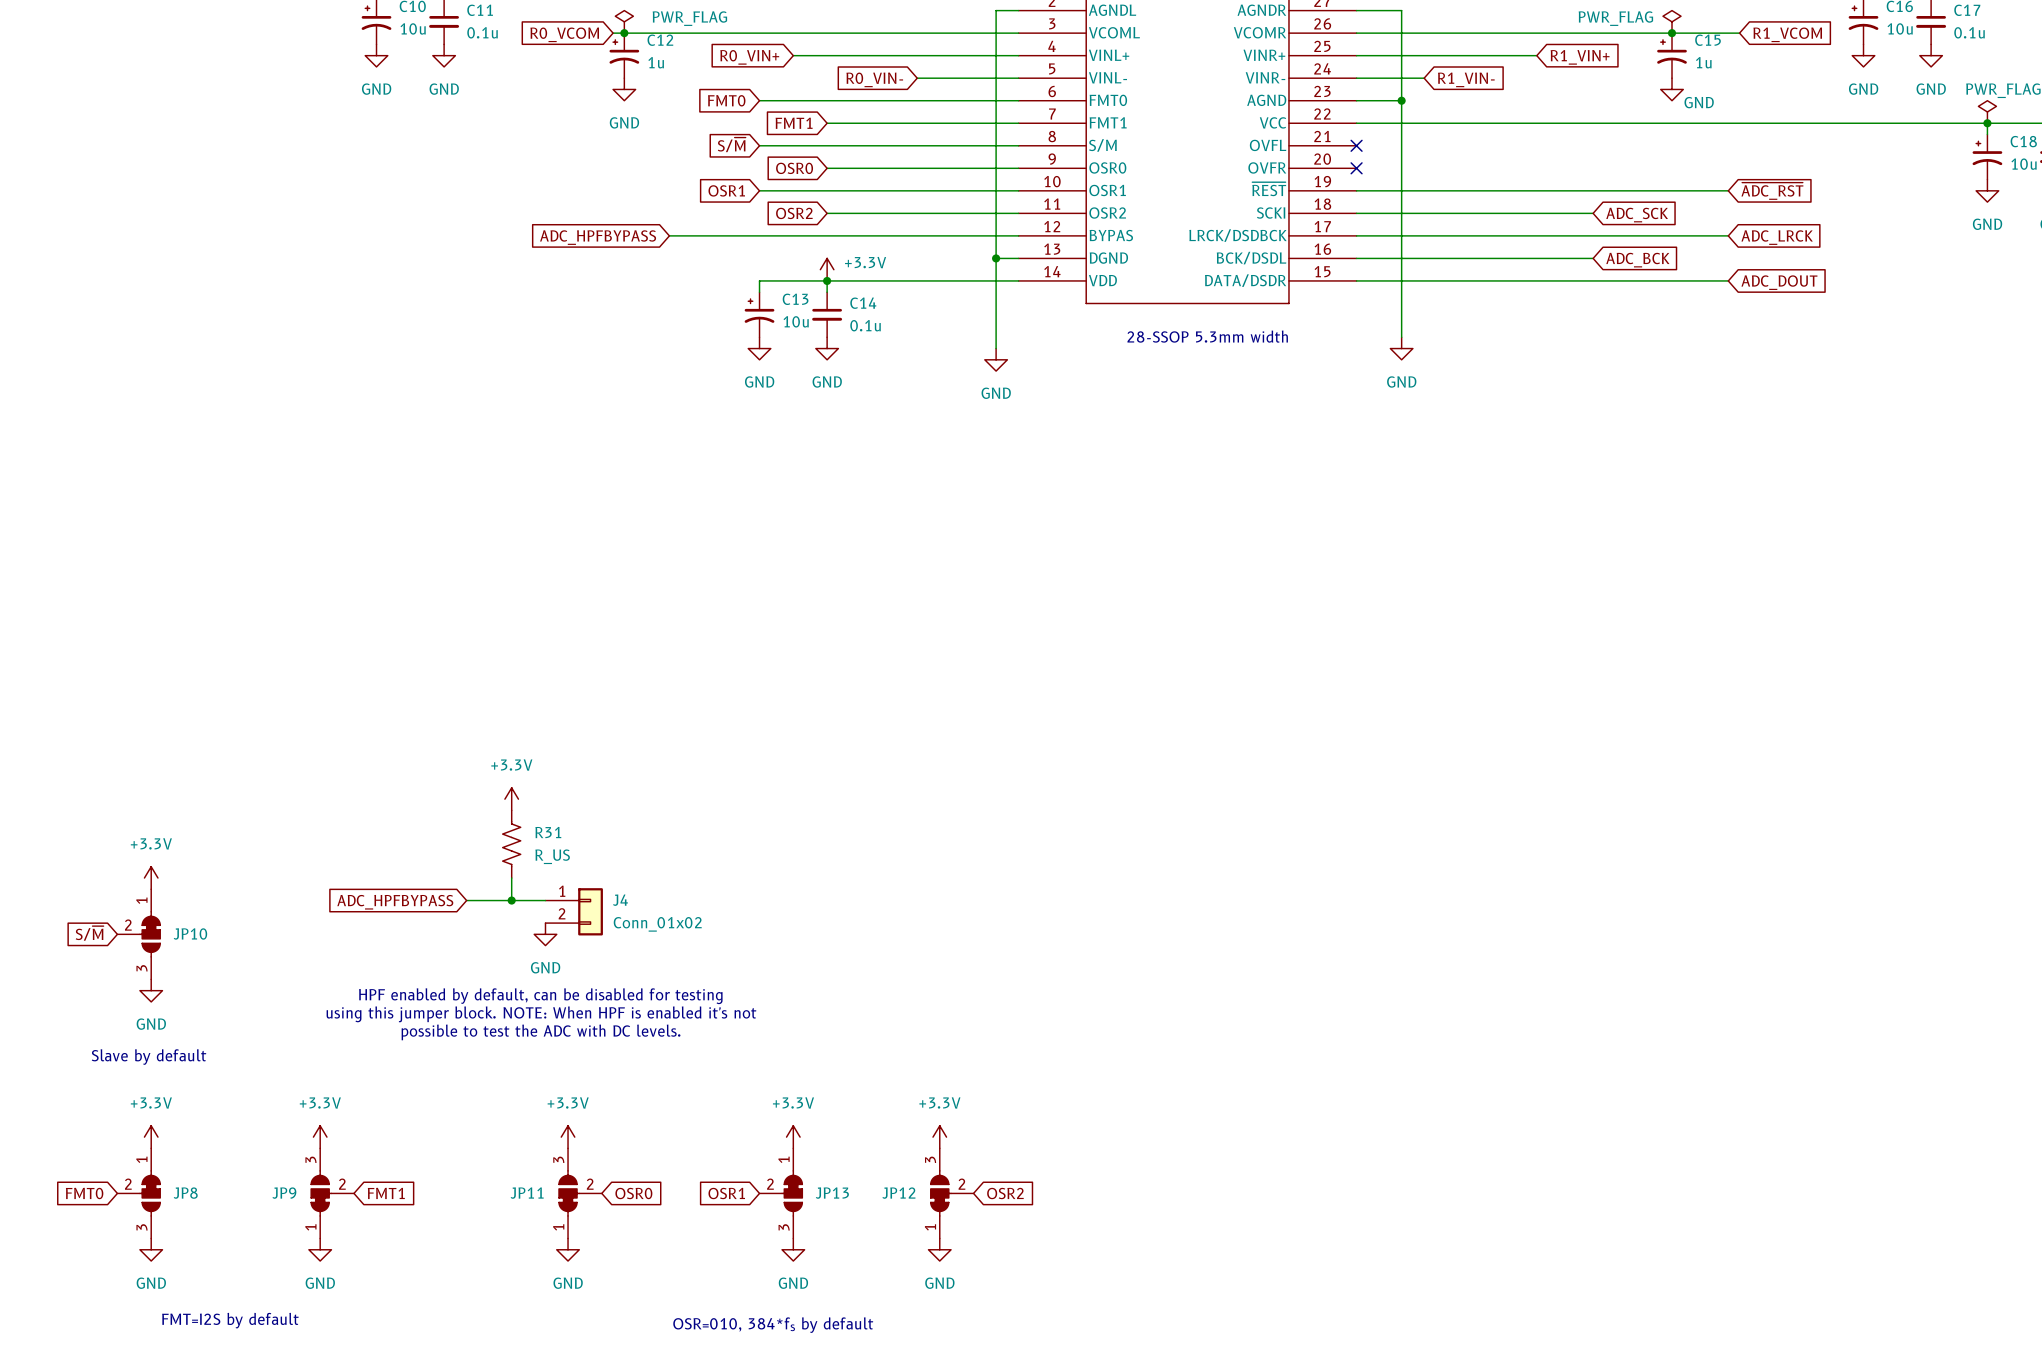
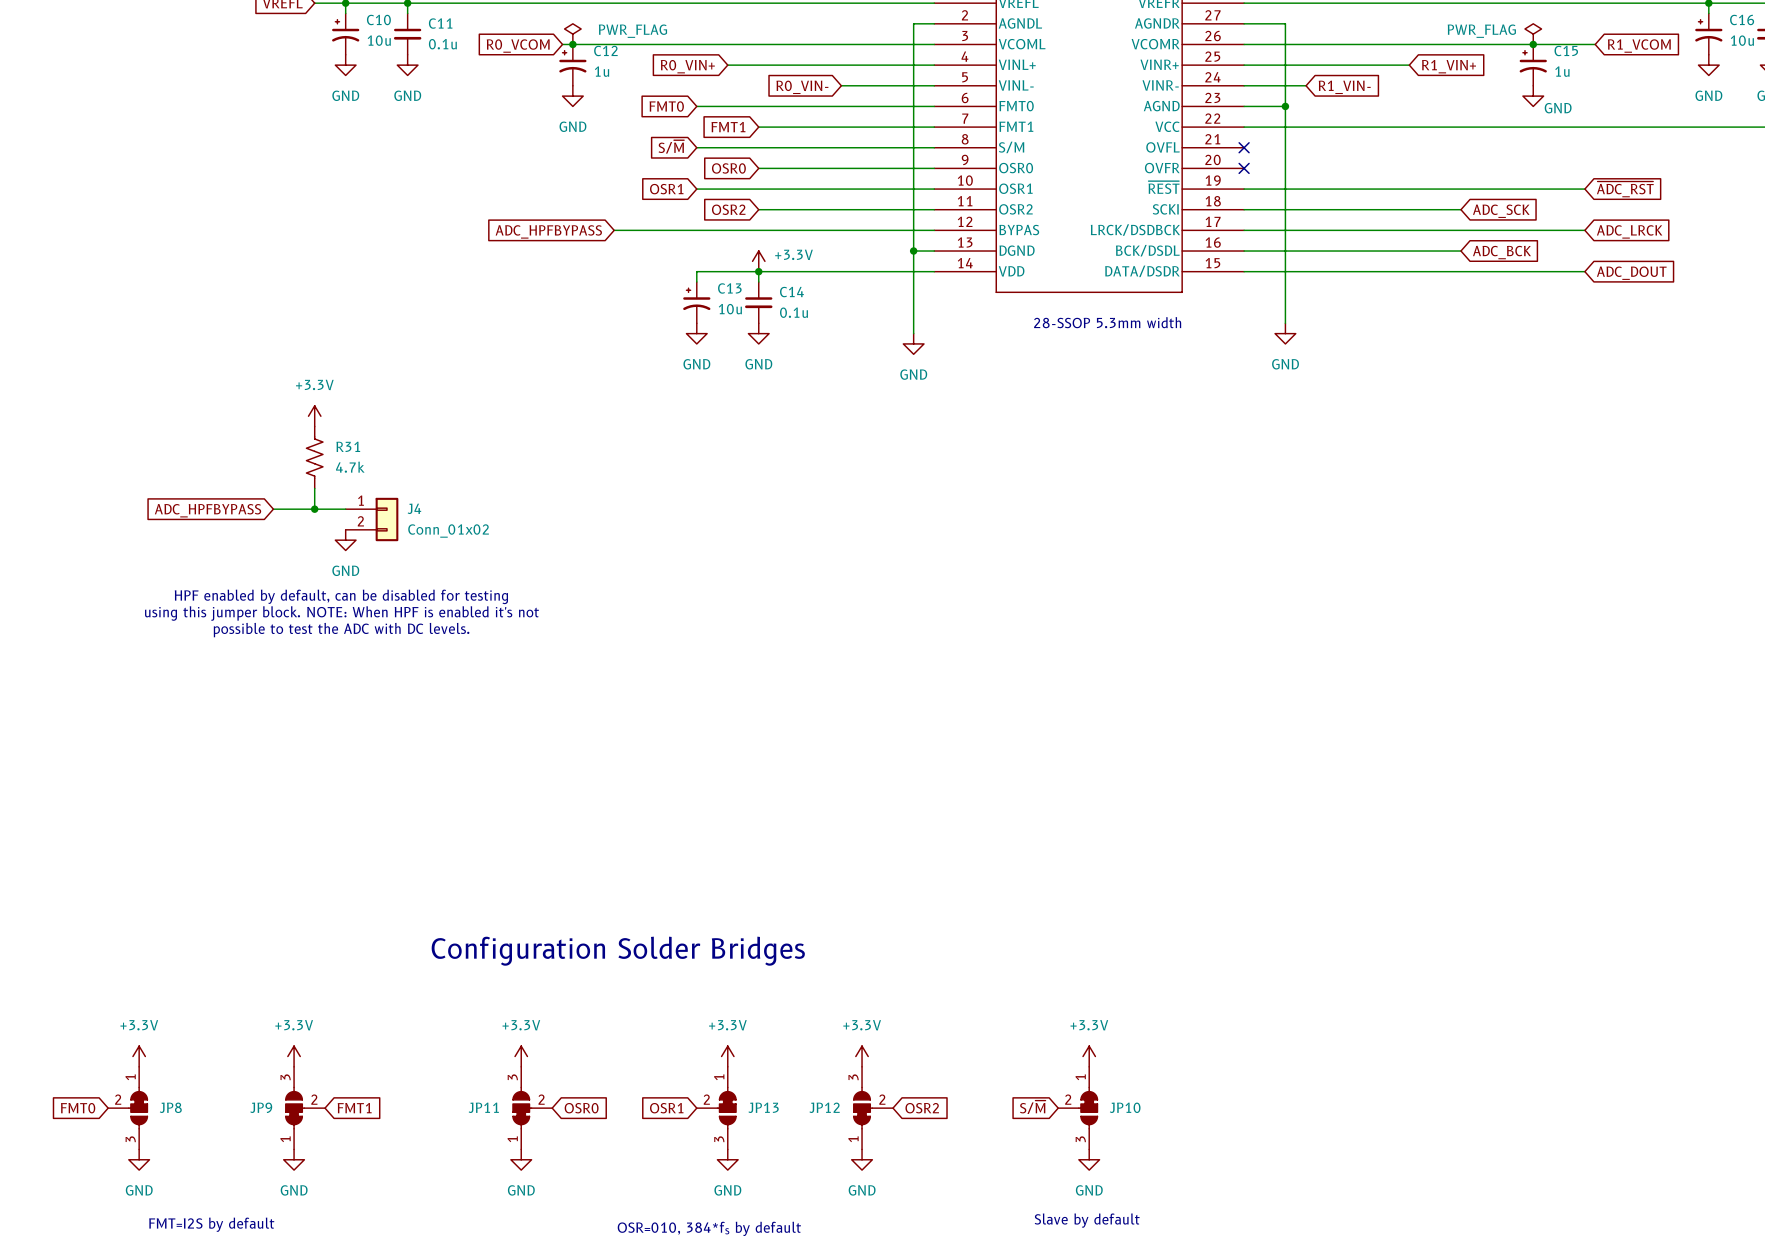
power symbol: none -> +3.3V (314, 416)
wire: none -> (314, 488) (314, 509)
wire: none -> (273, 509) (345, 509)
junction: none -> (314, 509)
global label: none -> ADC_HPFBYPASS (208, 510)
power symbol: none -> GND (345, 540)
text: none -> HPF enabled by default, can be disabled for testing (341, 596)
text: none -> using this jumper block. NOTE: When HPF is enabled it's not (341, 613)
text: none -> possible to test the ADC with DC levels. (341, 630)
power symbol: +3.3V (511, 799) -> none
R31 position: (511, 844) -> (314, 457)
R31 value: R_US (552, 856) -> 4.7k (350, 467)
power symbol: +3.3V (151, 878) -> none
wire: (511, 878) (511, 900) -> none
wire: (466, 900) (545, 900) -> none
junction: (511, 900) -> none
global label: ADC_HPFBYPASS (395, 902) -> none
J4 position: (574, 911) -> (372, 519)
global label: S/~{M} (89, 933) -> none
JP10 position: (138, 934) -> (1077, 1108)
power symbol: GND (545, 934) -> none
power symbol: GND (151, 990) -> none
text: HPF enabled by default, can be disabled for testing (540, 996) -> none
text: using this jumper block. NOTE: When HPF is enabled it's not (541, 1014) -> none
text: none -> Configuration Solder Bridges (618, 951)
text: possible to test the ADC with DC levels. (541, 1032) -> none
text: Slave by default (148, 1057) -> none
power symbol: none -> +3.3V (1089, 1056)
global label: none -> S/~{M} (1032, 1107)
power symbol: none -> GND (1089, 1159)
text: none -> Slave by default (1087, 1220)

